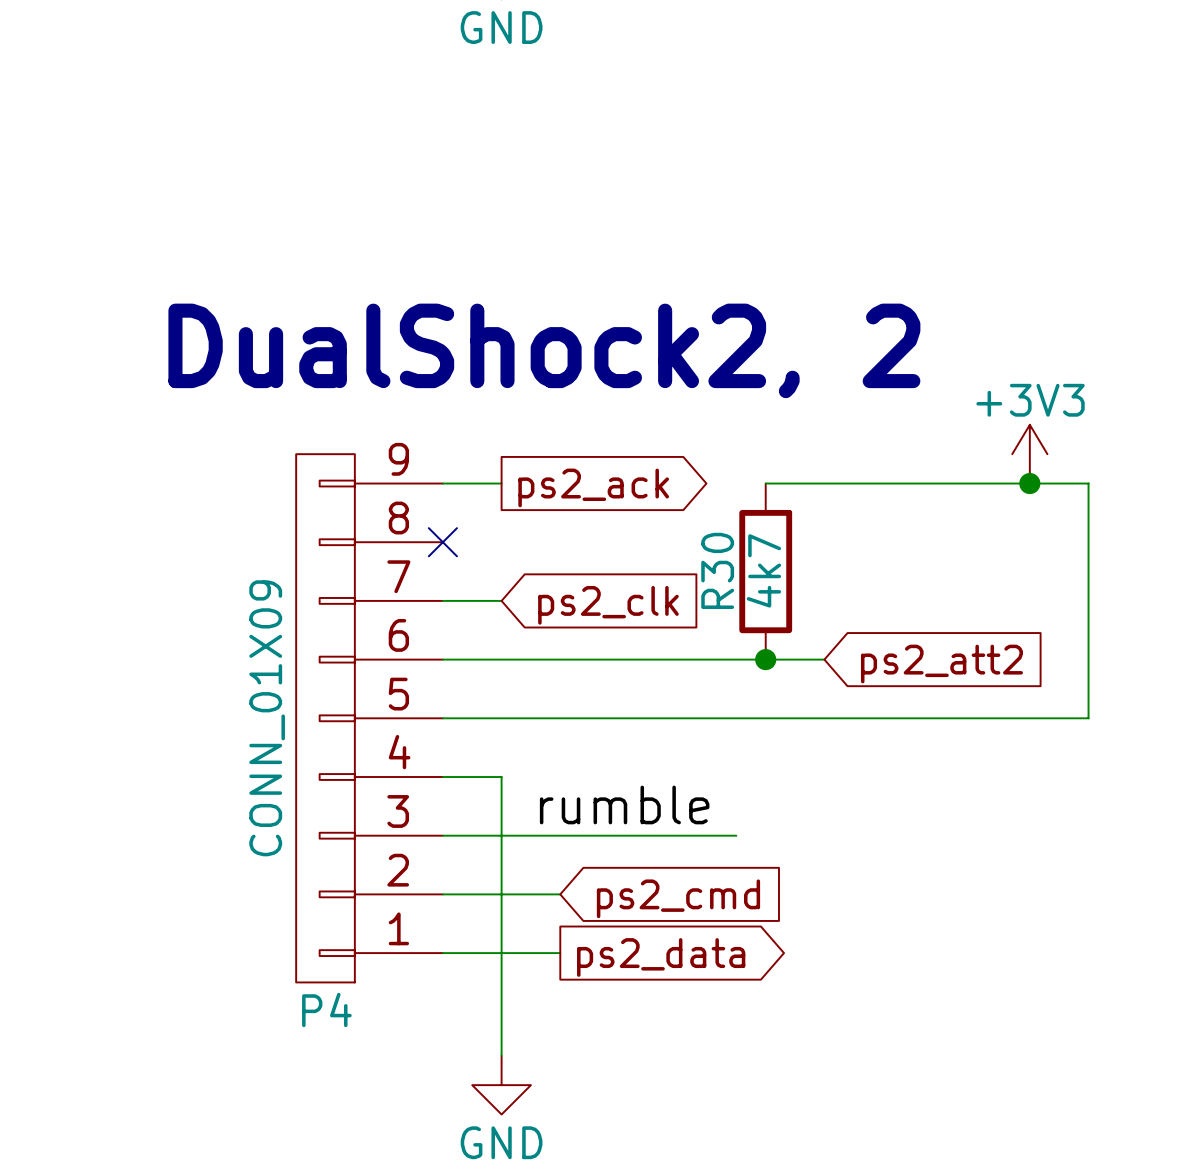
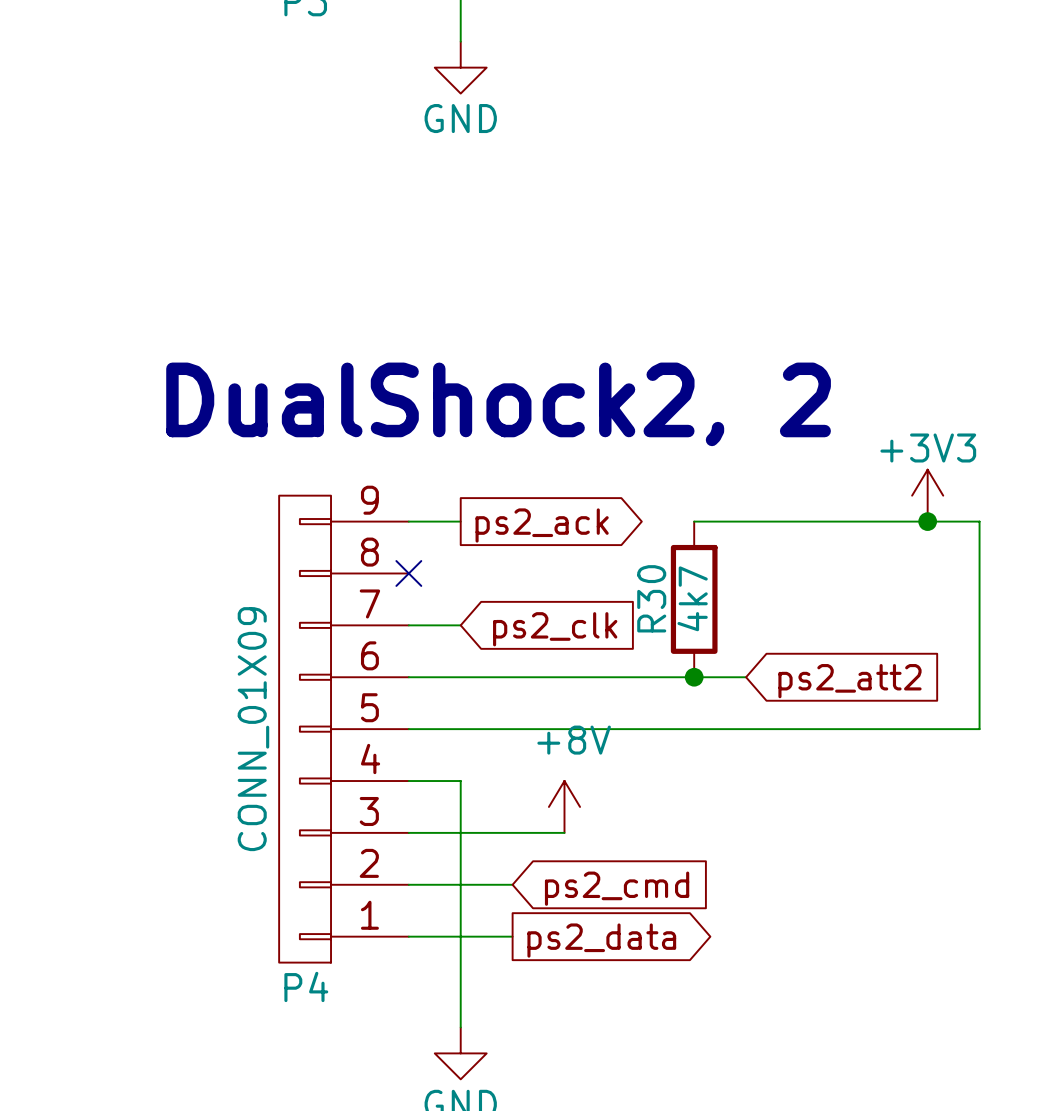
label: rumble (624, 804) -> none
power symbol: none -> +8V (564, 806)
wire: (618, 835) (736, 835) -> none

